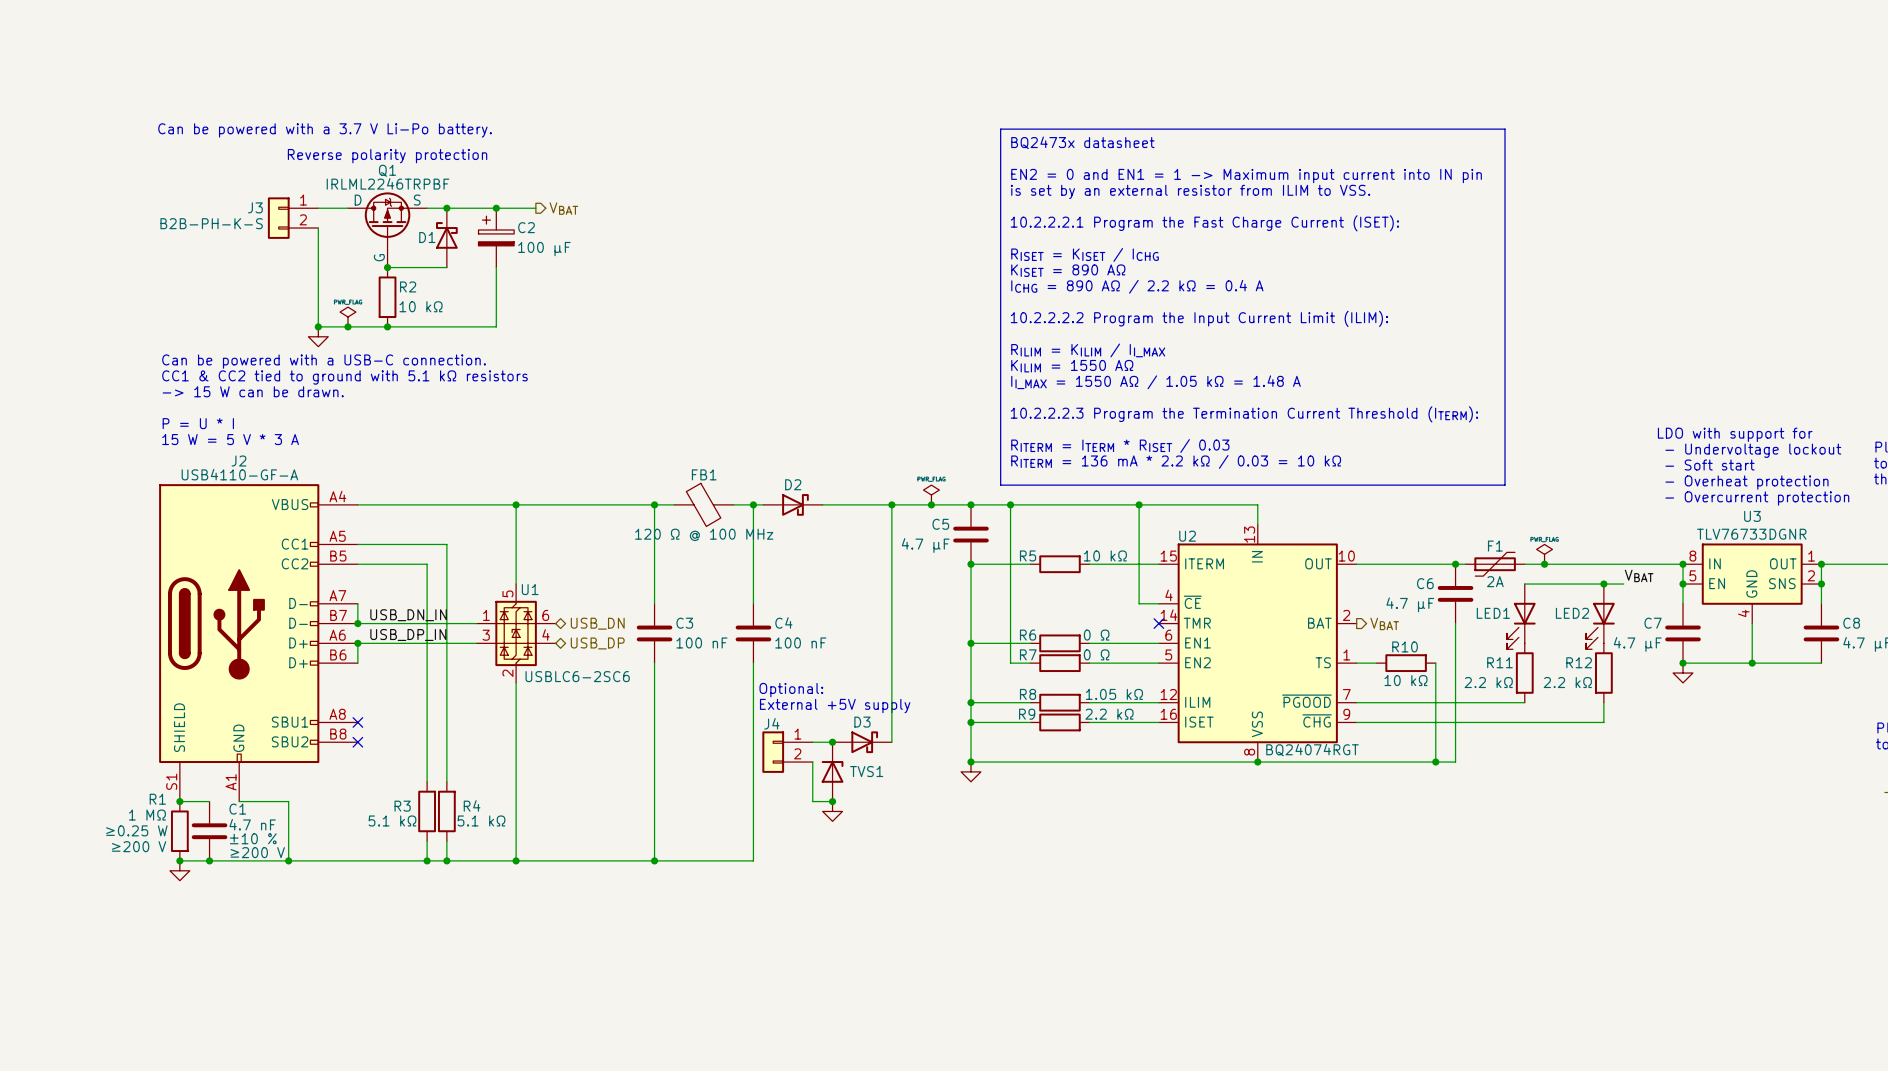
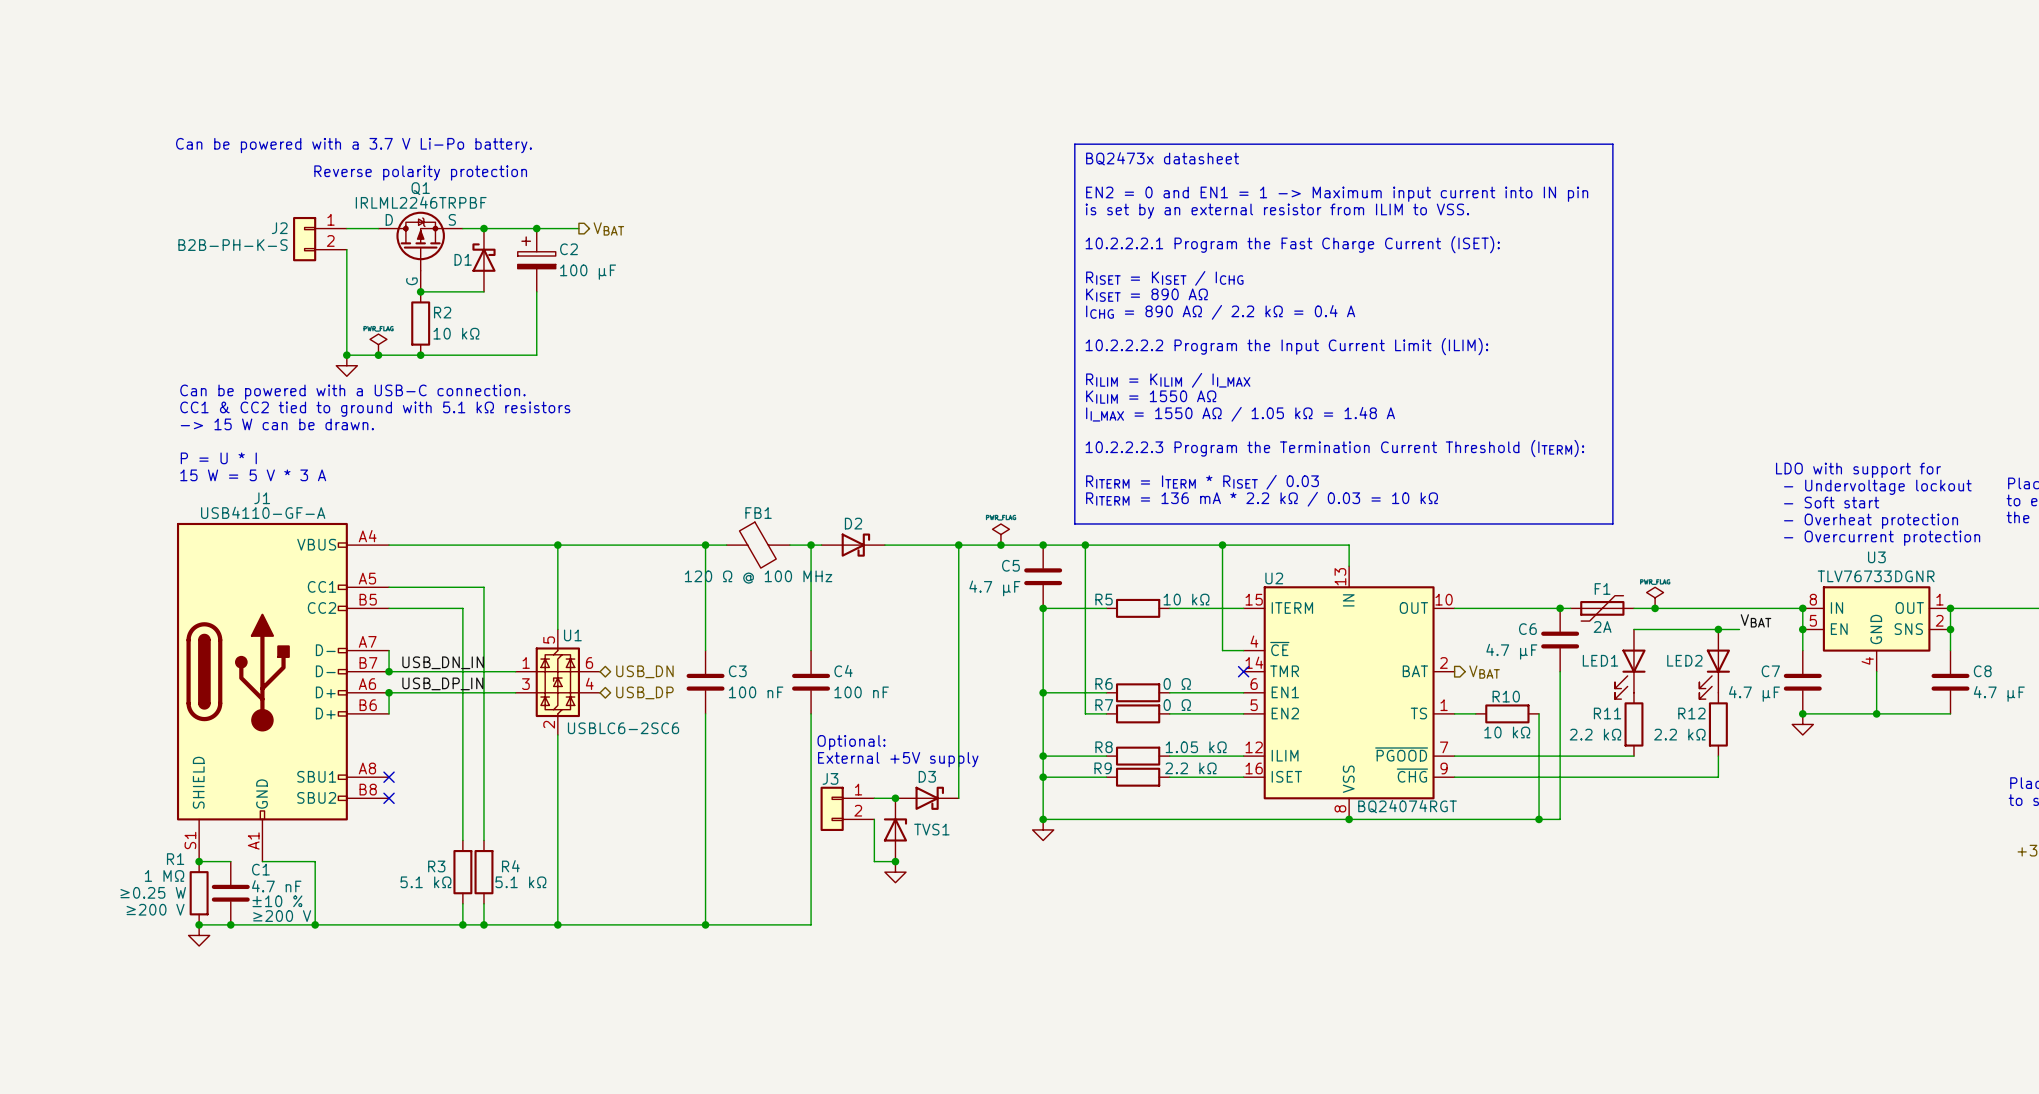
J3 name: J3 (255, 207) -> J2 (279, 228)
J2 name: J2 (238, 461) -> J1 (262, 498)
J4 name: J4 (771, 723) -> J3 (830, 778)

